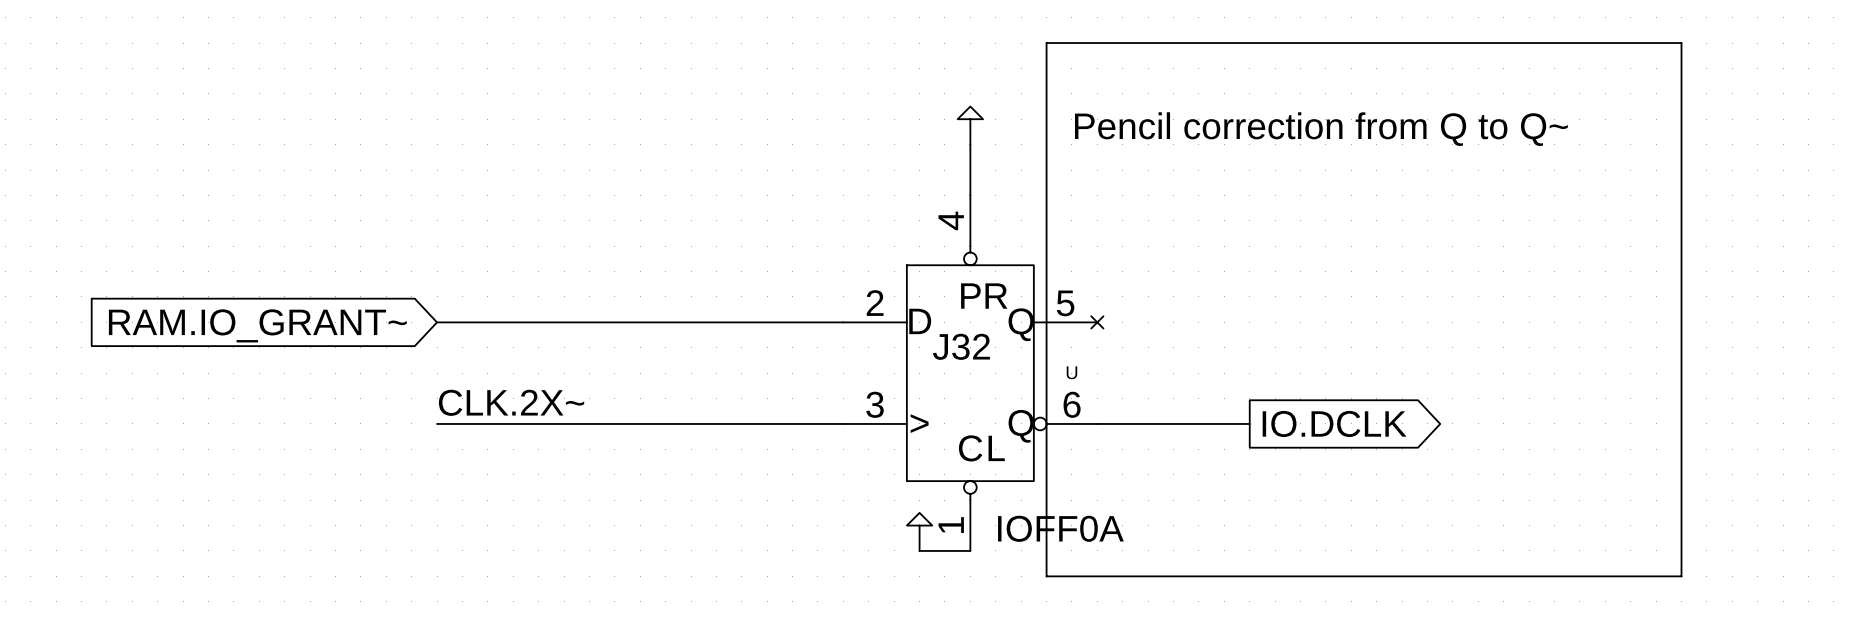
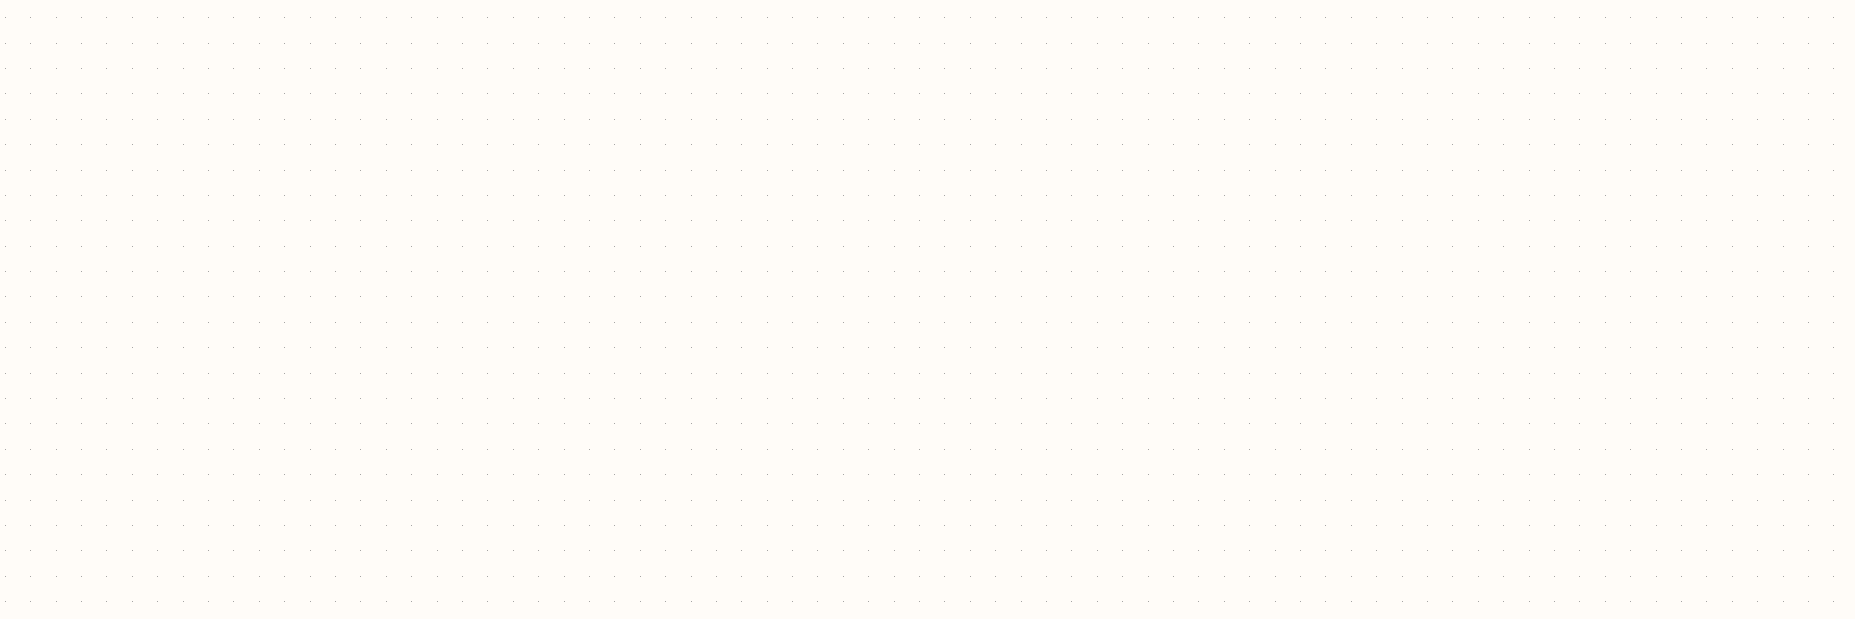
line: (1046, 43) (1681, 43) (1681, 576) (1046, 576) (1046, 43) -> none
power symbol: (970, 125) -> none
text: Pencil correction from Q to Q~ (1321, 129) -> none
wire: (970, 144) (970, 195) -> none
wire: (437, 322) (843, 322) -> none
no-connect mark: (1097, 322) -> none
global label: RAM.IO_GRANT~ (257, 325) -> none
U: (970, 373) -> none
label: CLK.2X~ (511, 402) -> none
wire: (437, 423) (843, 423) -> none
wire: (1097, 423) (1249, 423) -> none
global label: IO.DCLK (1334, 423) -> none
power symbol: (919, 531) -> none
wire: (919, 550) (970, 550) -> none

